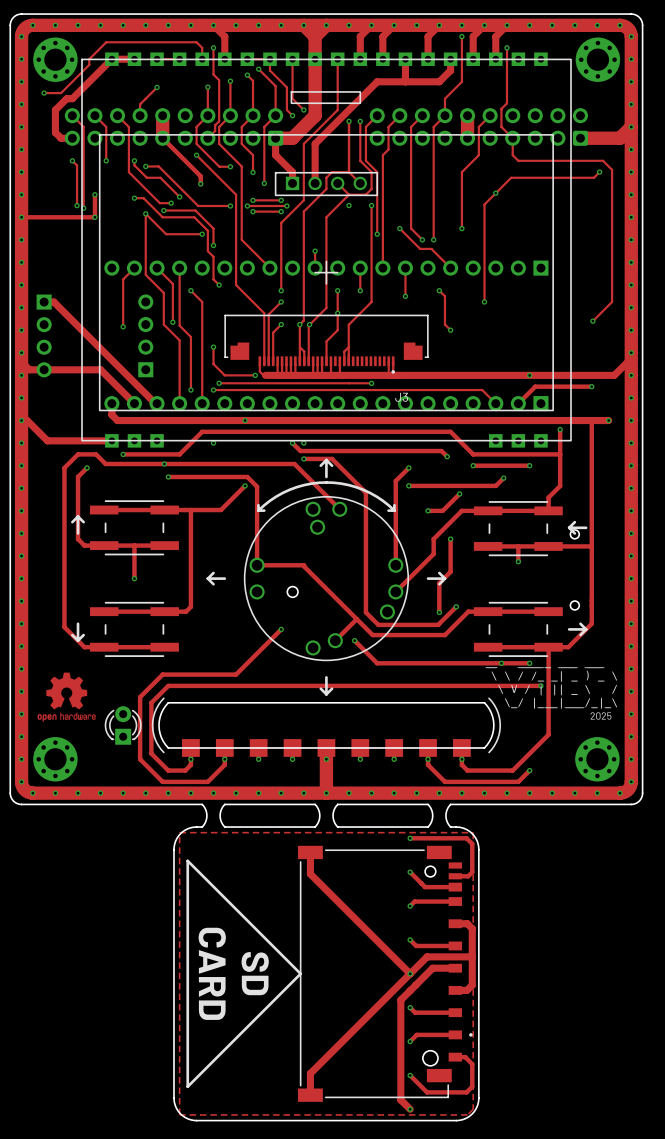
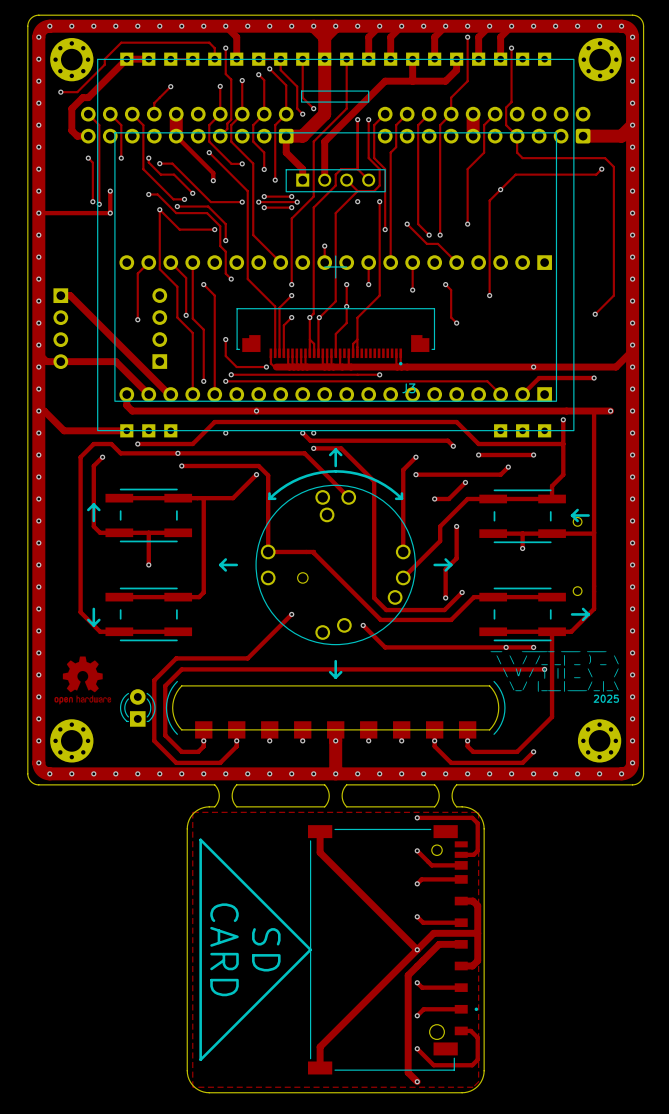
track: (356, 619) (335, 640) -> none

